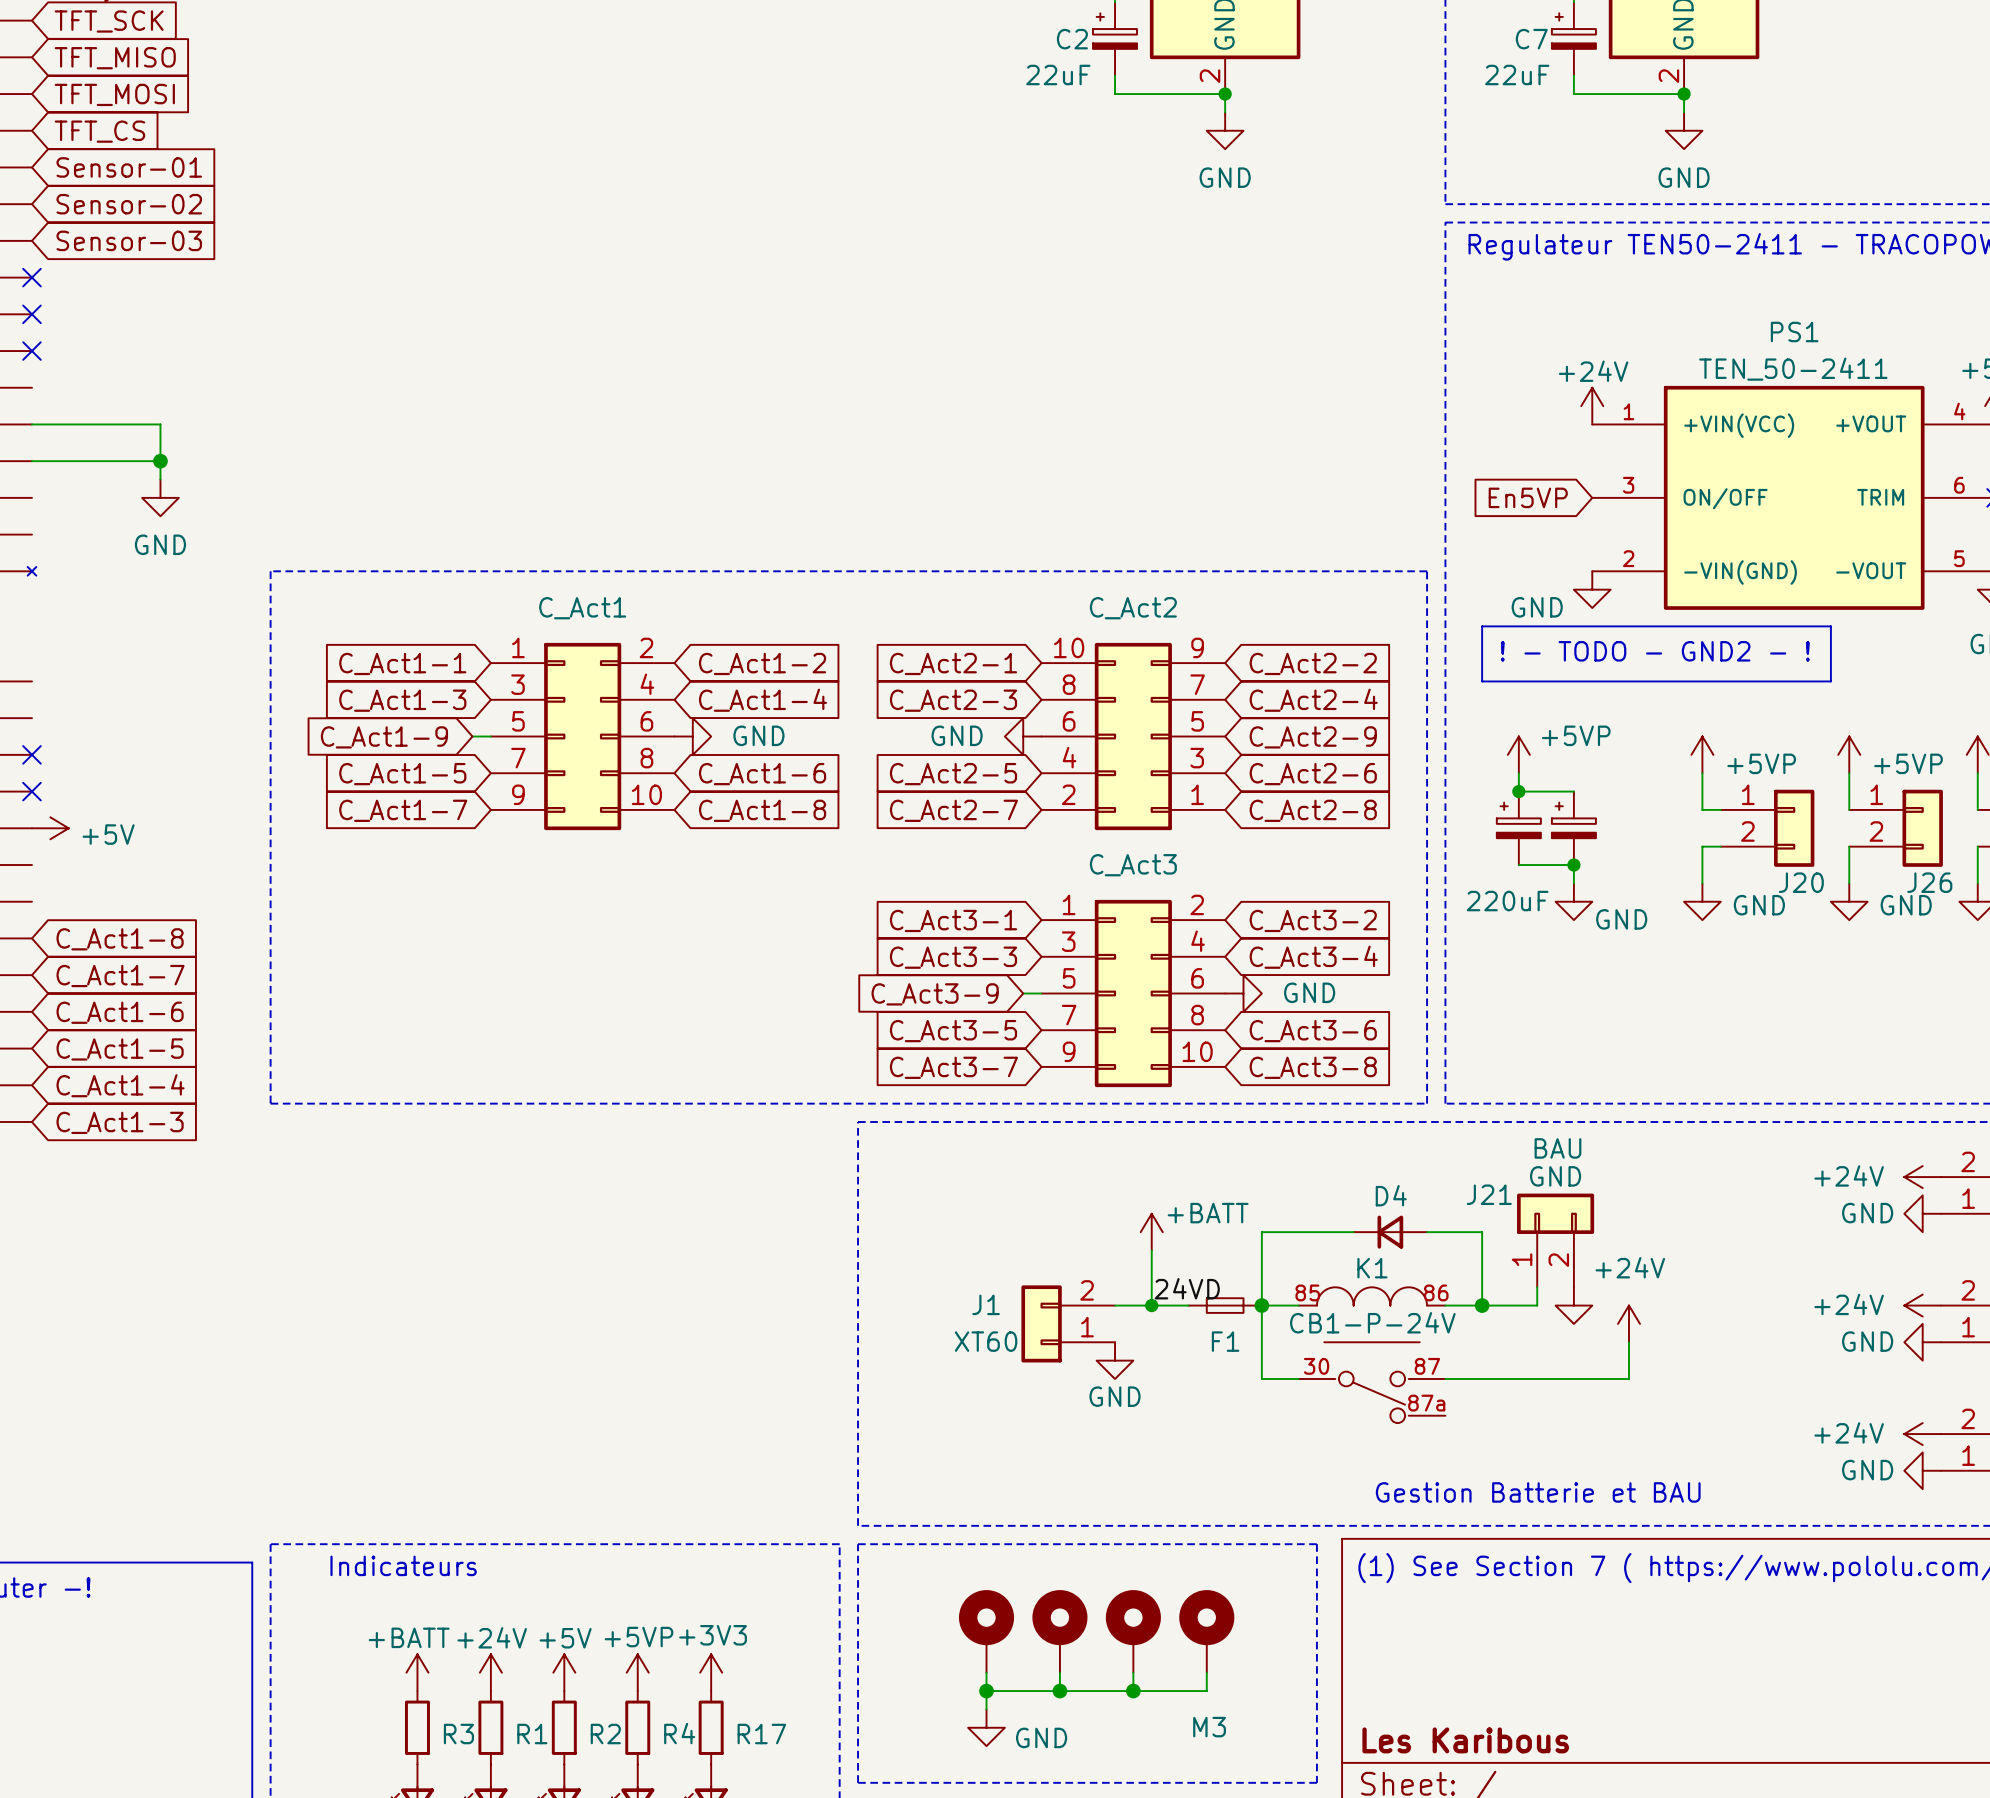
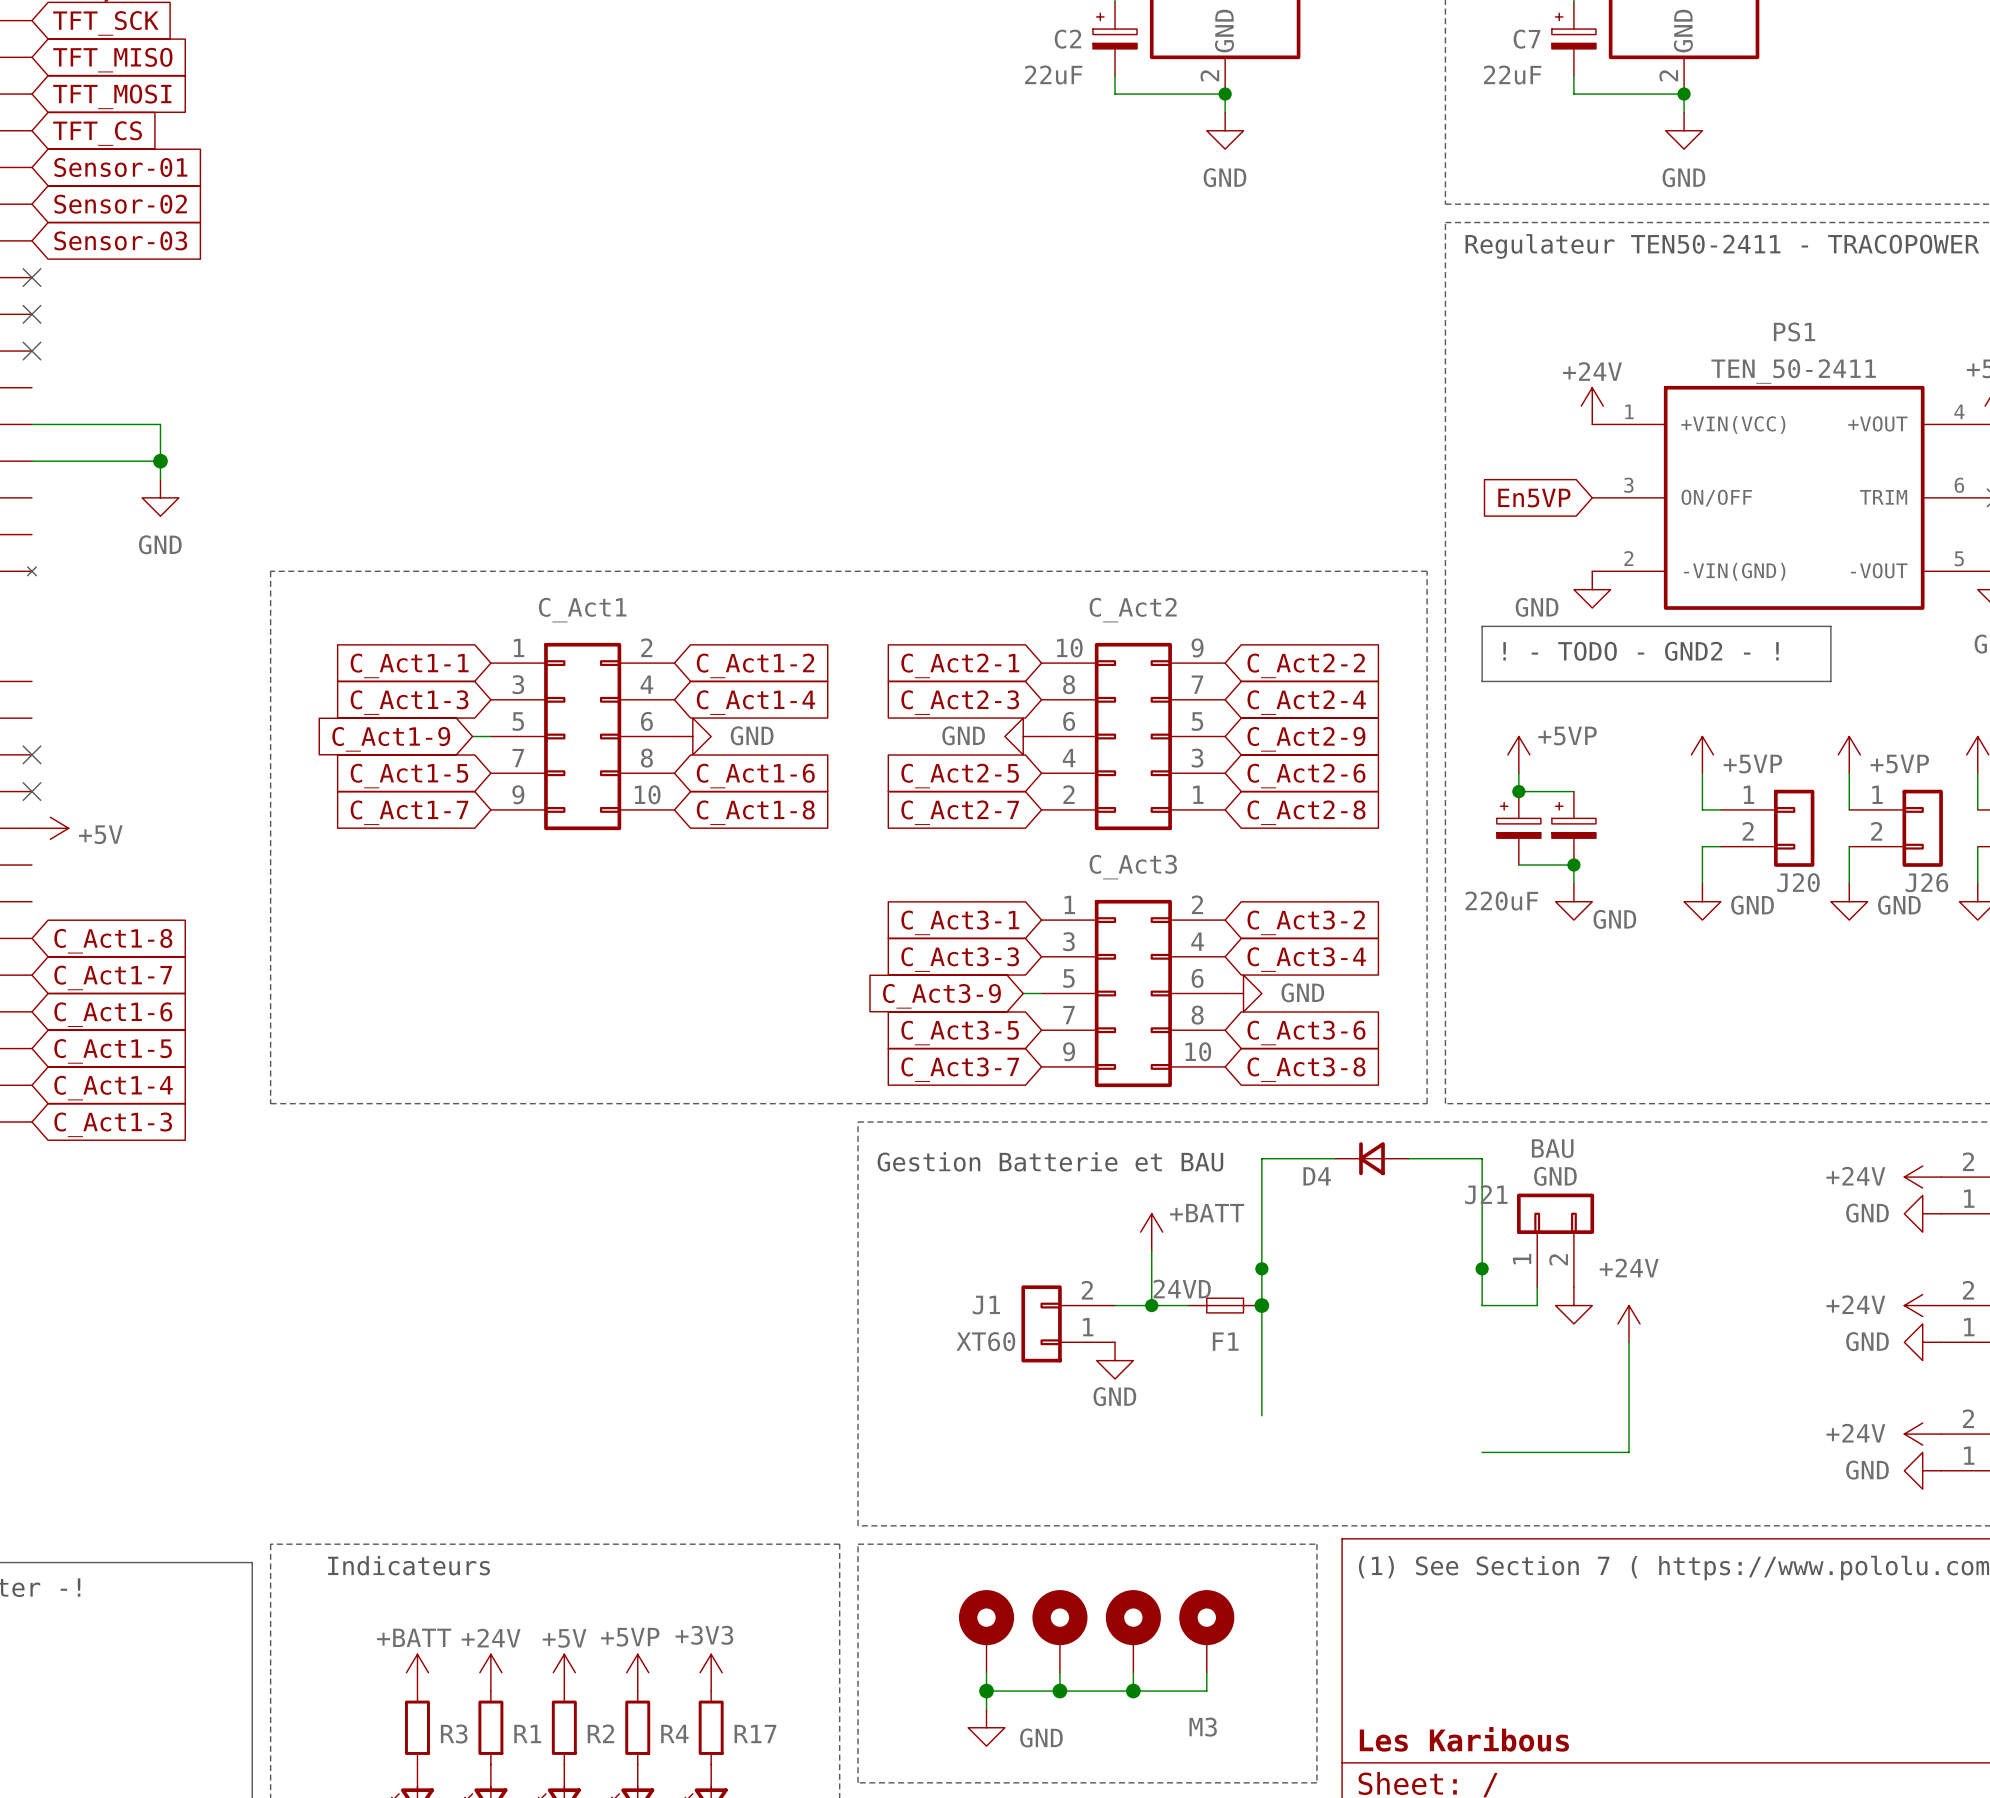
text: none -> Gestion Batterie et BAU (1050, 1161)
D4 name position: D4 (1391, 1195) -> D4 (1317, 1176)
wire: (1261, 1232) (1353, 1232) -> (1261, 1232) (1261, 1158) (1335, 1158)
D4 position: (1390, 1232) -> (1372, 1158)
wire: (1427, 1232) (1482, 1232) -> (1408, 1158) (1482, 1158) (1482, 1232)
junction: none -> (1261, 1268)
junction: none -> (1482, 1268)
wire: (1261, 1305) (1298, 1305) -> none
wire: (1445, 1305) (1482, 1305) -> none
junction: (1482, 1305) -> none
K1: CB1-P-24V (1372, 1355) -> none
wire: (1261, 1378) (1298, 1378) -> (1261, 1378) (1261, 1415)
wire: (1445, 1378) (1628, 1378) -> (1482, 1452) (1628, 1452) (1628, 1378)
text: Gestion Batterie et BAU (1538, 1492) -> none

